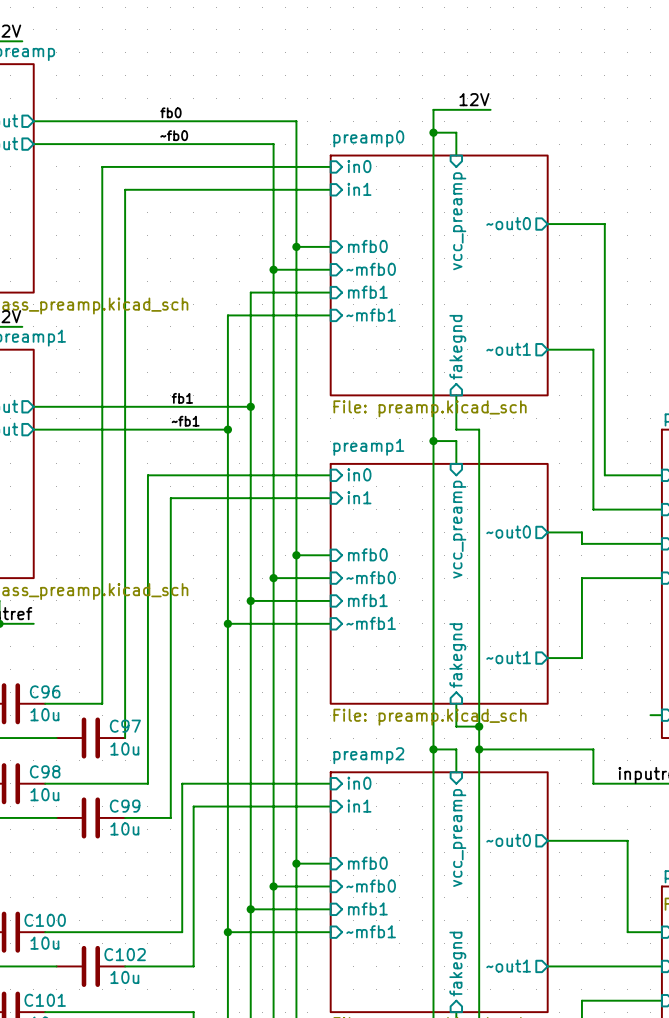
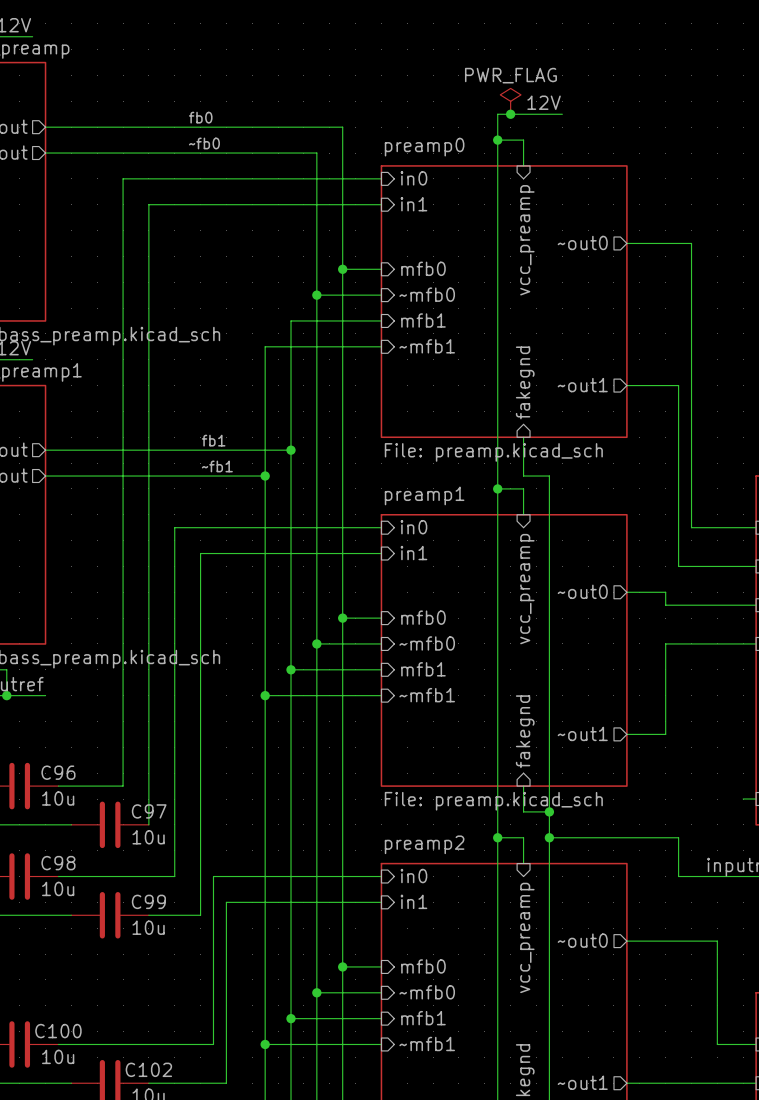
power symbol: none -> PWR_FLAG (510, 101)
junction: none -> (510, 114)

